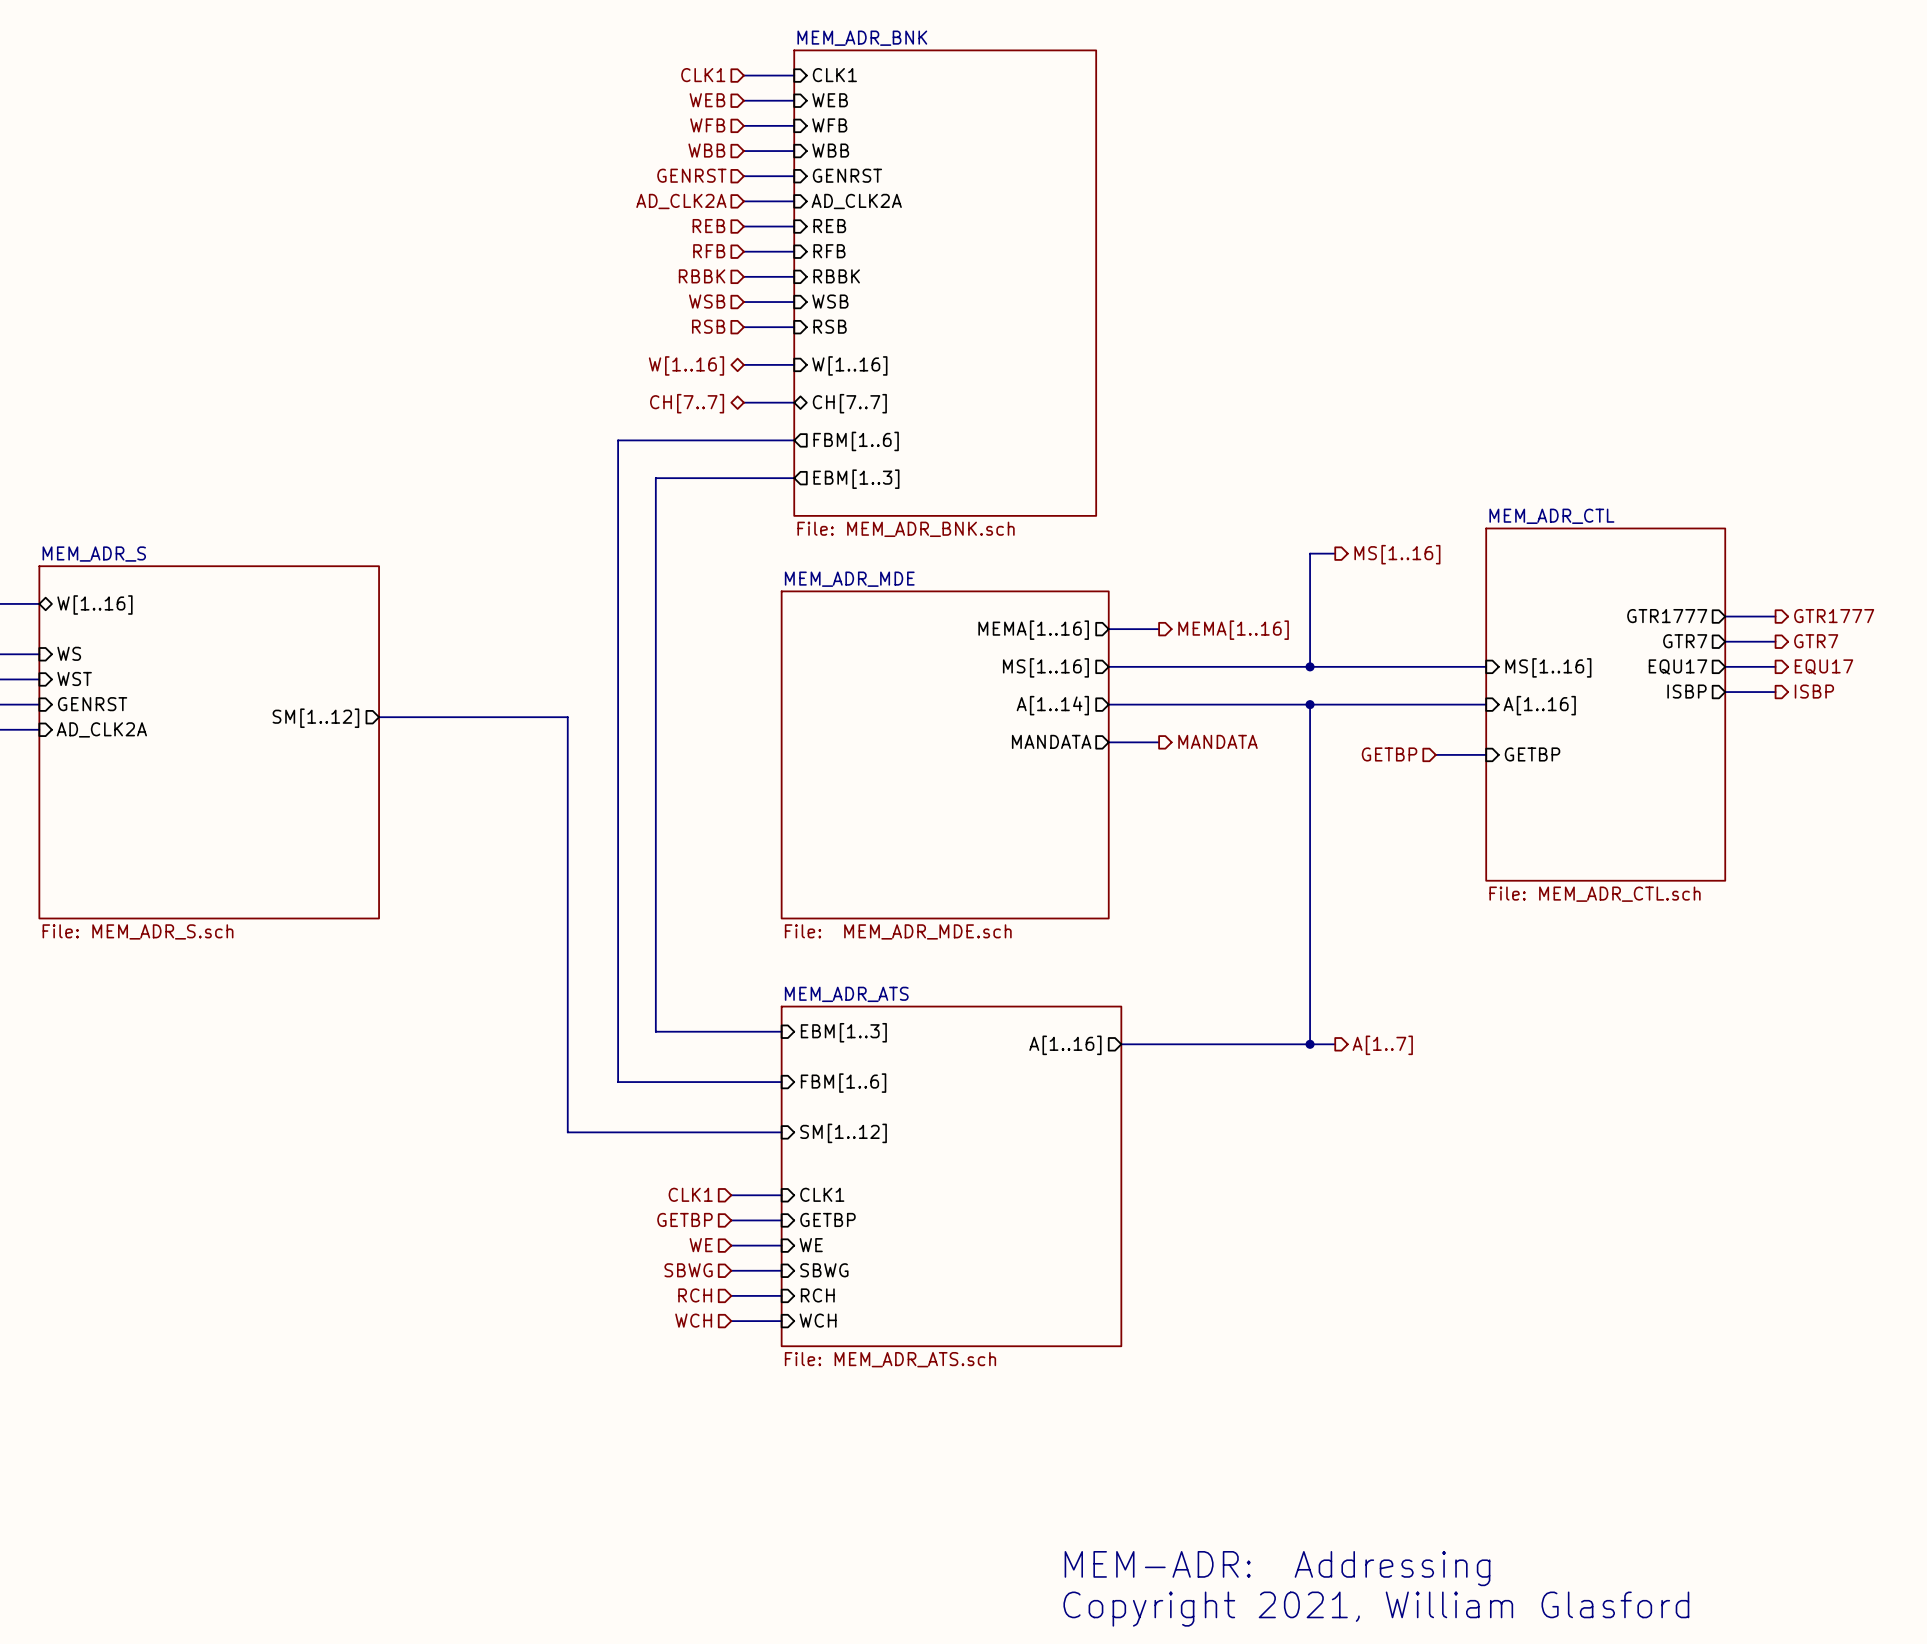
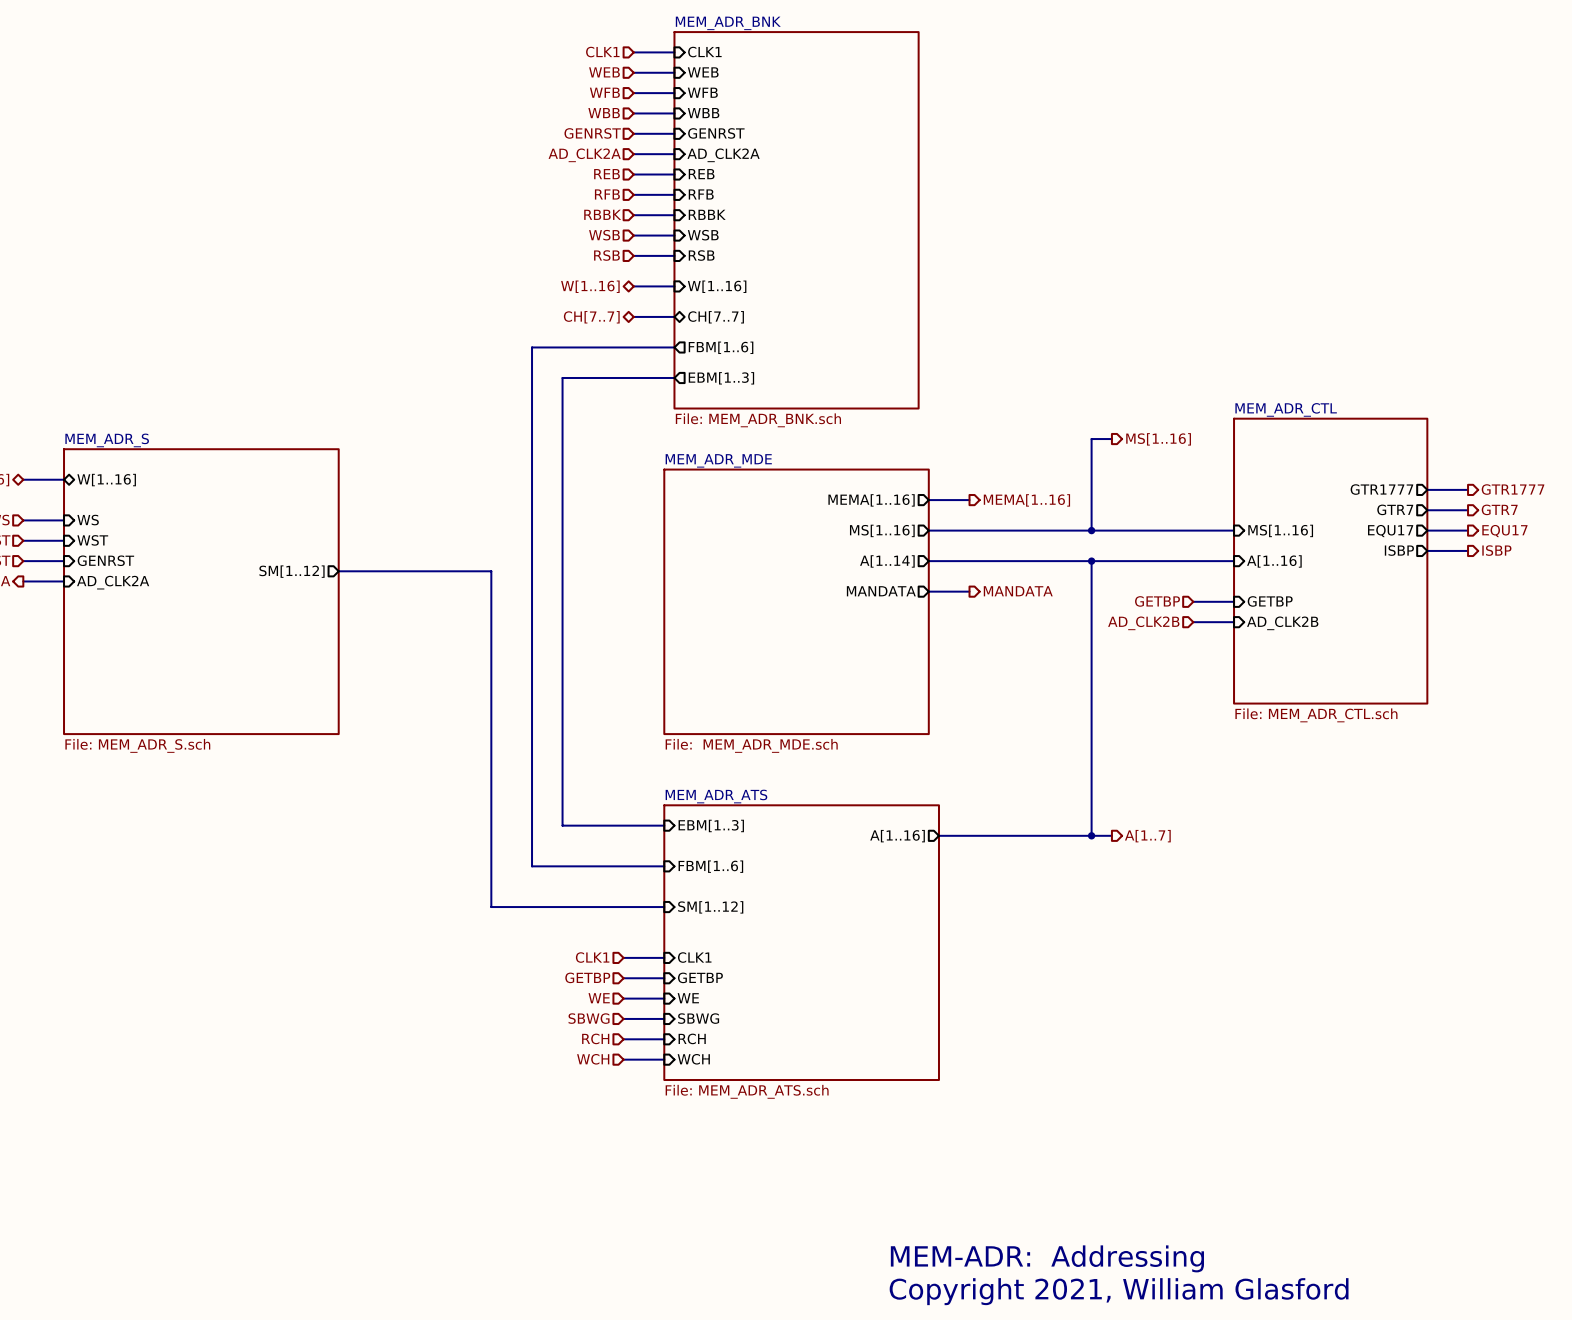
hierarchical label: none -> AD_CLK2B (1143, 623)
wire: none -> (1193, 622) (1234, 622)
sheet pin: none -> AD_CLK2B (1282, 623)

